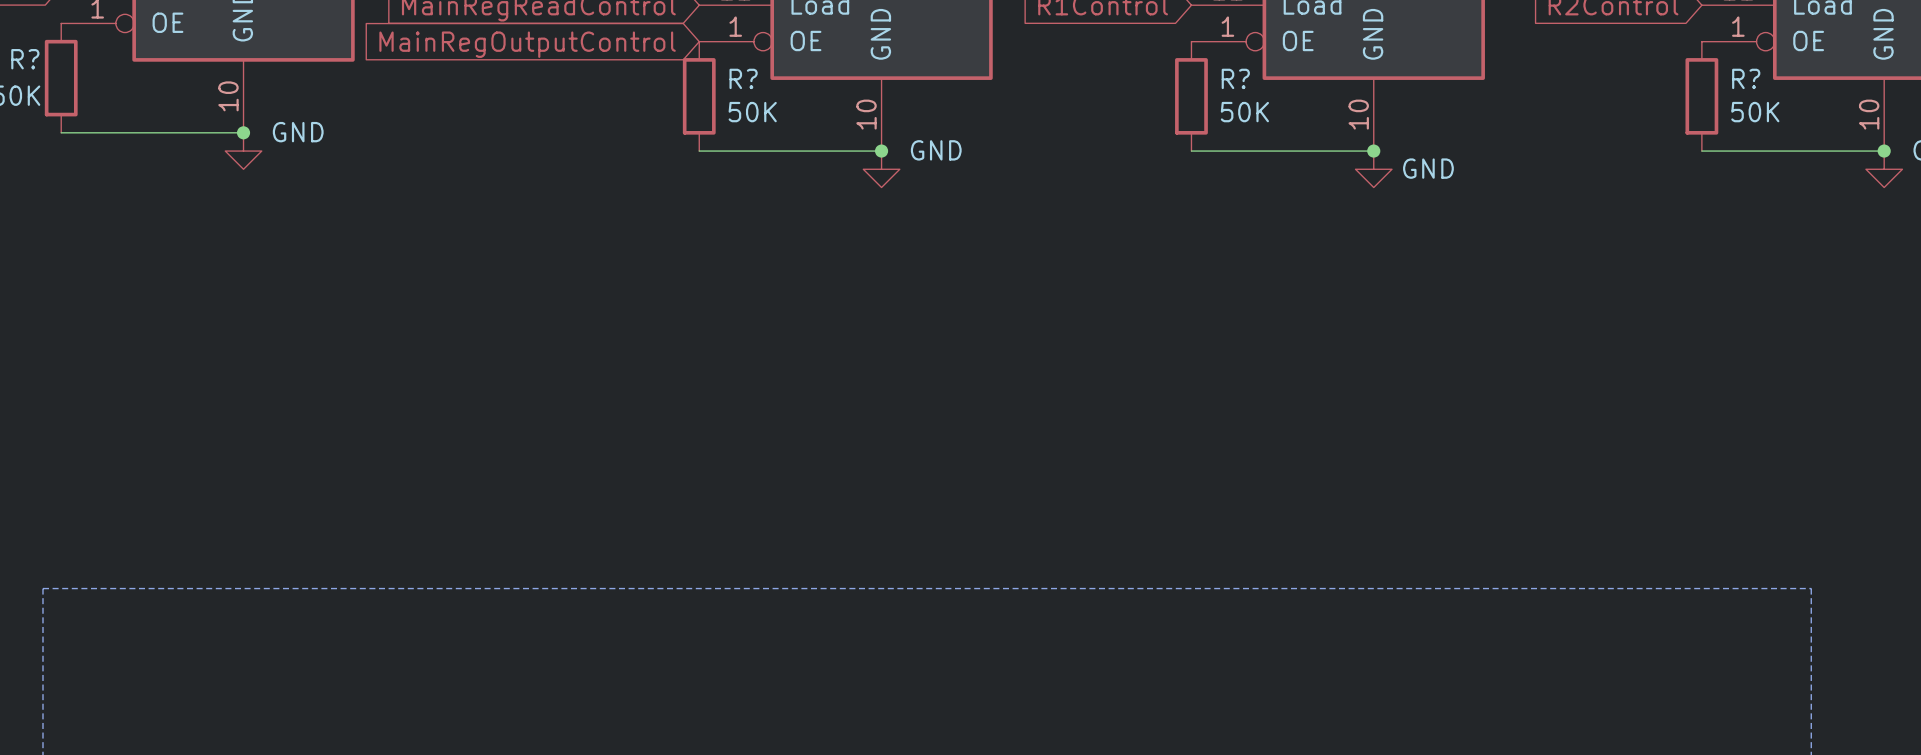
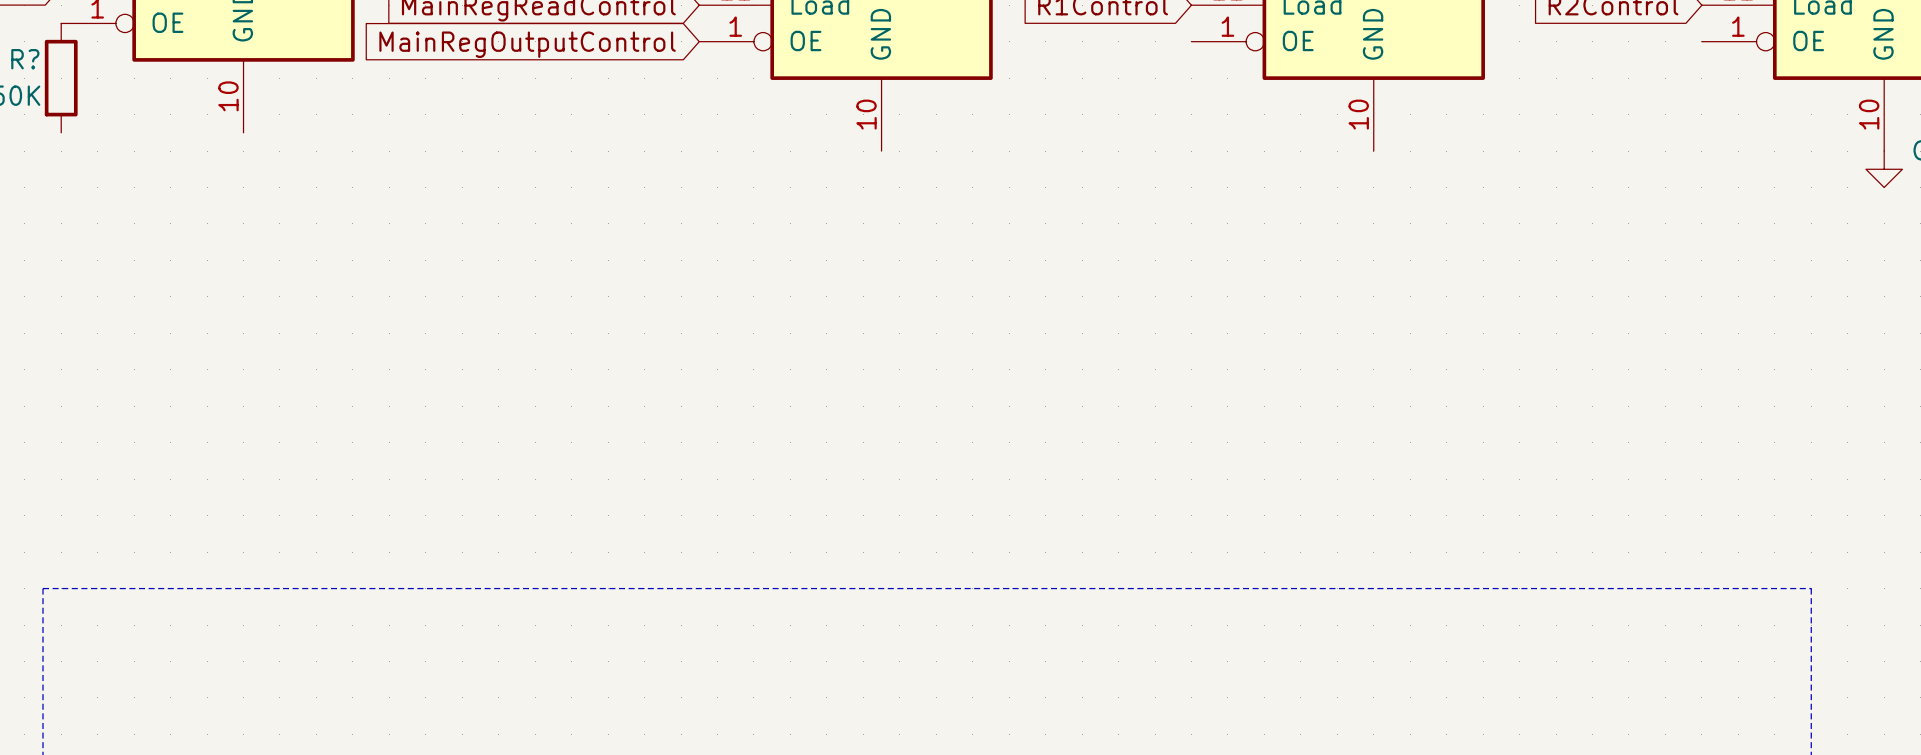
R?: 50K (699, 96) -> none
R?: 50K (1191, 96) -> none
R?: 50K (1701, 96) -> none
wire: (61, 132) (243, 132) -> none
junction: (243, 132) -> none
power symbol: GND (243, 151) -> none
wire: (699, 151) (881, 151) -> none
junction: (881, 151) -> none
wire: (1191, 151) (1373, 151) -> none
junction: (1373, 151) -> none
wire: (1701, 151) (1884, 151) -> none
junction: (1884, 151) -> none
power symbol: GND (881, 169) -> none
power symbol: GND (1373, 169) -> none

